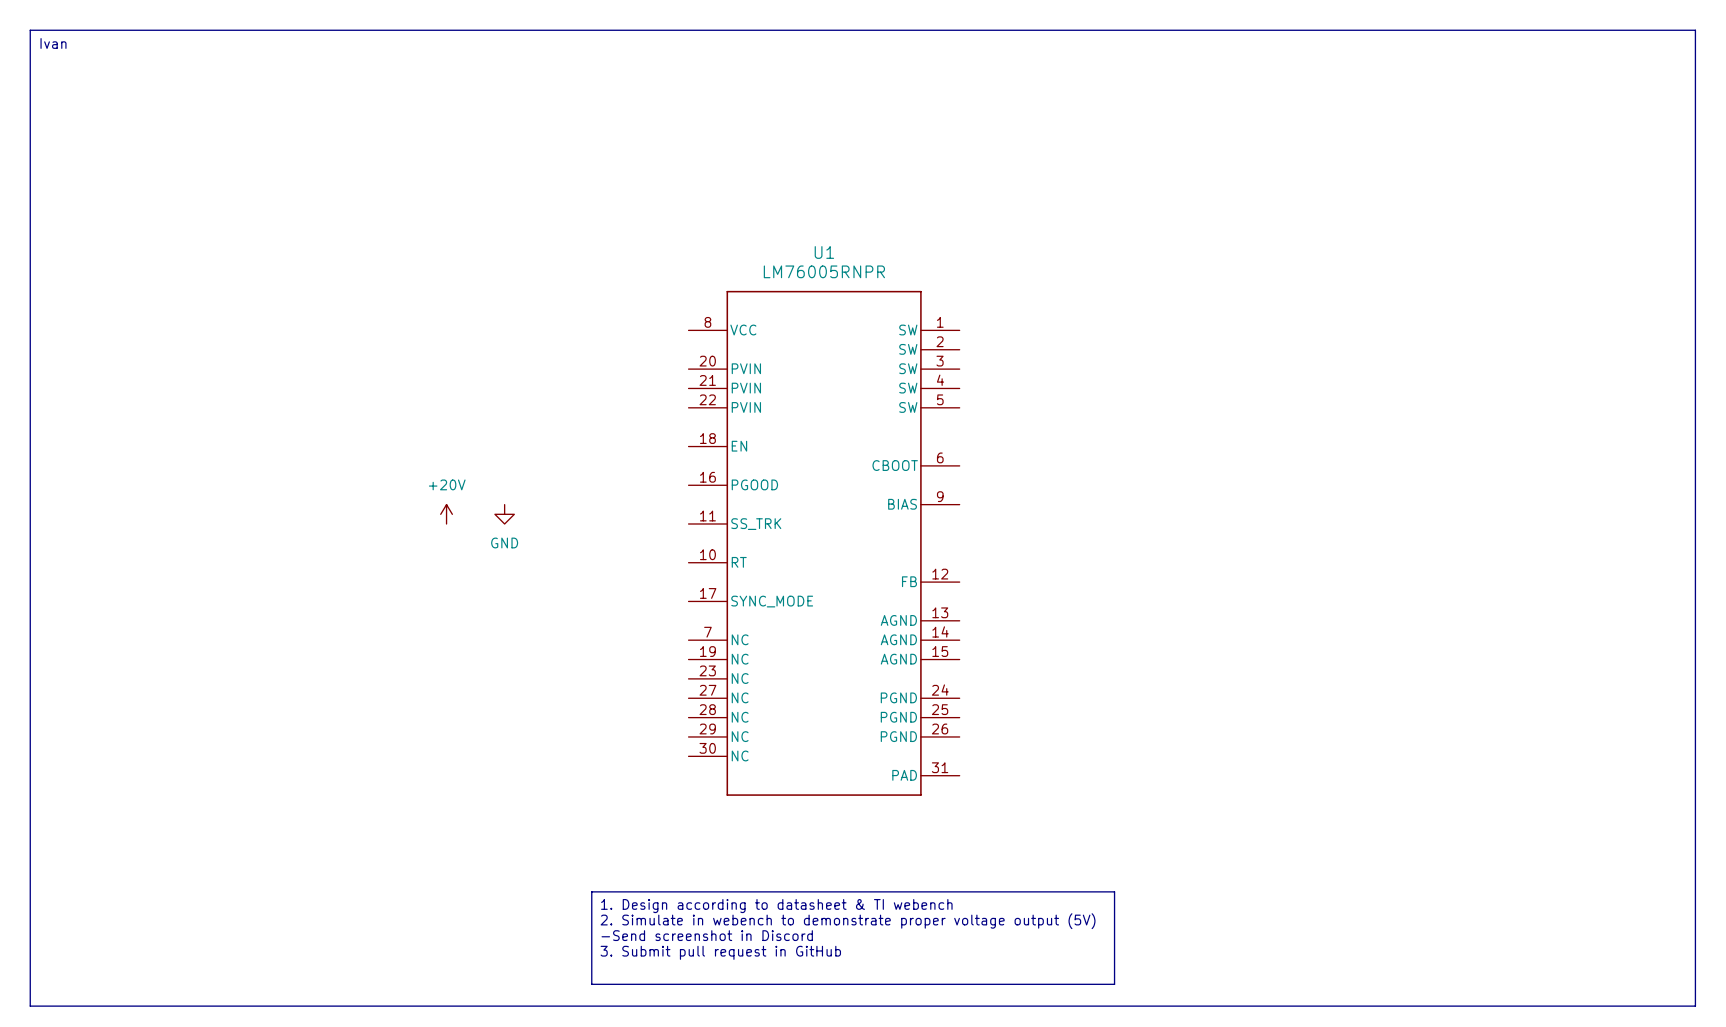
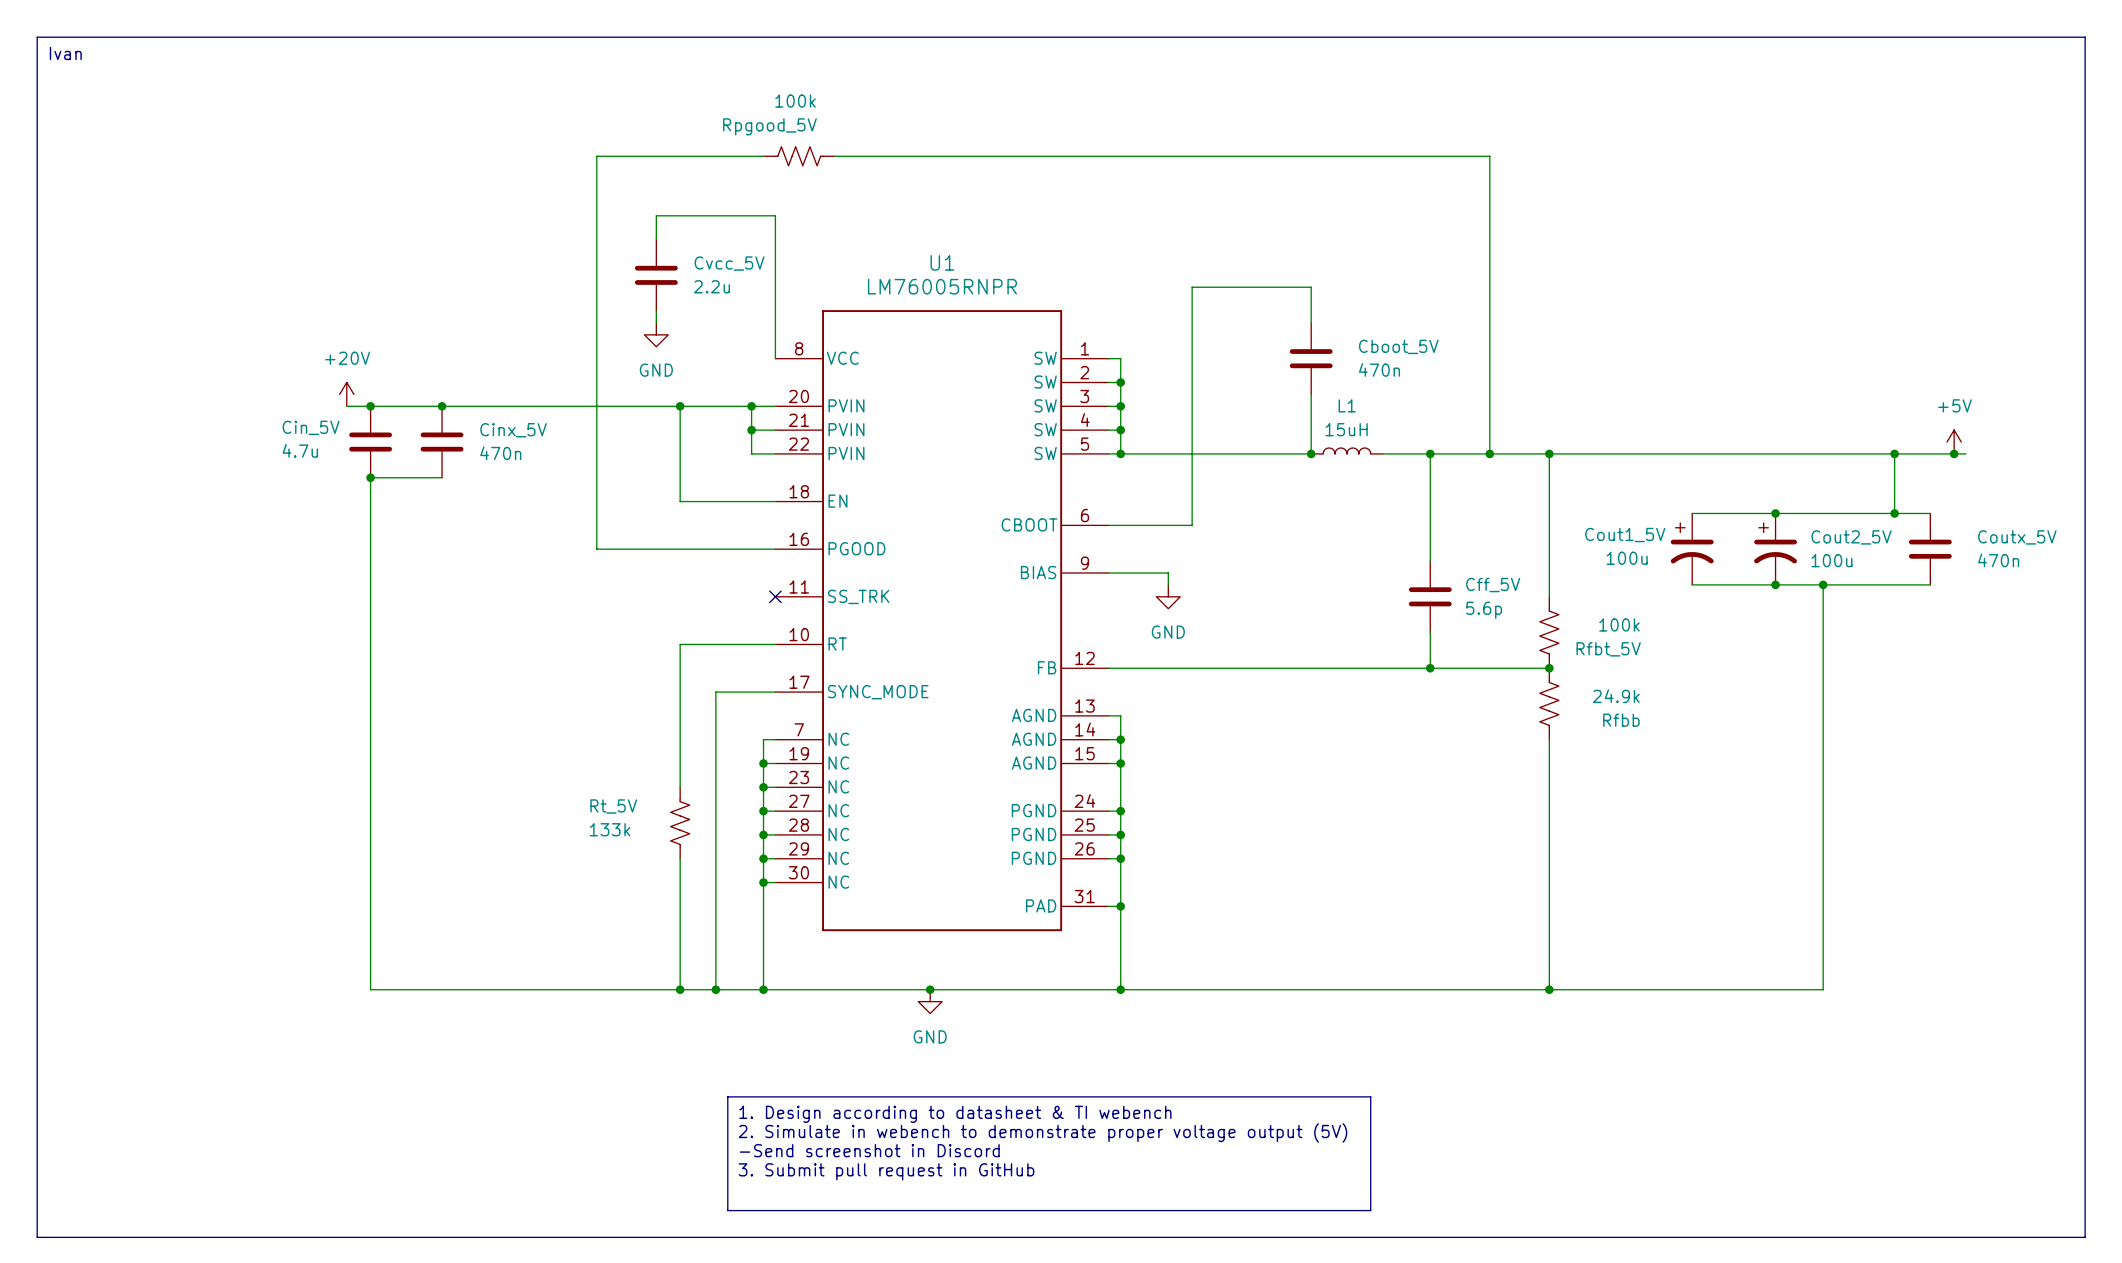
wire: none -> (763, 156) (596, 156) (596, 549) (775, 549)
Rpgood_5V: none -> 100k (799, 156)
wire: none -> (834, 156) (1489, 156) (1489, 453)
wire: none -> (656, 239) (656, 215) (775, 215) (775, 358)
Cvcc_5V: none -> 2.2u (656, 275)
wire: none -> (656, 311) (656, 322)
wire: none -> (1311, 322) (1311, 287) (1192, 287) (1192, 525) (1108, 525)
power symbol: none -> GND (656, 334)
wire: none -> (1108, 358) (1120, 358) (1120, 453)
Cboot_5V: none -> 470n (1311, 358)
wire: none -> (1108, 382) (1120, 382)
junction: none -> (1120, 382)
power symbol: none -> +20V (346, 394)
wire: none -> (1311, 394) (1311, 453) (1108, 453)
wire: none -> (346, 406) (775, 406)
junction: none -> (370, 406)
junction: none -> (442, 406)
wire: none -> (680, 406) (680, 501) (775, 501)
junction: none -> (680, 406)
wire: none -> (751, 406) (751, 453) (775, 453)
junction: none -> (751, 406)
wire: none -> (1108, 406) (1120, 406)
junction: none -> (1120, 406)
wire: none -> (751, 430) (775, 430)
junction: none -> (751, 430)
wire: none -> (1108, 430) (1120, 430)
junction: none -> (1120, 430)
Cin_5V: none -> 4.7u (370, 442)
Cinx_5V: none -> 470n (442, 442)
power symbol: none -> +5V (1954, 442)
L1: none -> 15uH (1346, 450)
junction: none -> (1120, 453)
junction: none -> (1311, 453)
wire: none -> (1382, 453) (1966, 453)
wire: none -> (1430, 453) (1430, 561)
junction: none -> (1430, 453)
junction: none -> (1489, 453)
wire: none -> (1549, 453) (1549, 596)
junction: none -> (1549, 453)
wire: none -> (1894, 453) (1894, 513)
junction: none -> (1894, 453)
junction: none -> (1954, 453)
junction: none -> (370, 477)
wire: none -> (442, 477) (370, 477) (370, 989) (1823, 989) (1823, 584)
wire: none -> (1692, 513) (1930, 513)
junction: none -> (1775, 513)
junction: none -> (1894, 513)
Cout1_5V: none -> 100u (1692, 549)
Cout2_5V: none -> 100u (1775, 549)
Coutx_5V: none -> 470n (1930, 549)
wire: none -> (1108, 573) (1168, 573) (1168, 584)
wire: none -> (1692, 584) (1930, 584)
junction: none -> (1775, 584)
junction: none -> (1823, 584)
no-connect mark: none -> (775, 596)
power symbol: none -> GND (1168, 596)
Cff_5V: none -> 5.6p (1430, 596)
power symbol: +20V (446, 514) -> none
power symbol: GND (504, 514) -> none
wire: none -> (1430, 632) (1430, 668)
Rfbt_5V: none -> 100k (1549, 632)
wire: none -> (775, 644) (680, 644) (680, 787)
U1 position: (824, 543) -> (942, 620)
wire: none -> (1108, 668) (1549, 668)
junction: none -> (1430, 668)
junction: none -> (1549, 668)
wire: none -> (775, 692) (715, 692) (715, 989)
Rfbb: none -> 24.9k (1549, 703)
wire: none -> (1108, 715) (1120, 715) (1120, 989)
wire: none -> (775, 739) (763, 739) (763, 989)
wire: none -> (1108, 739) (1120, 739)
junction: none -> (1120, 739)
wire: none -> (1549, 739) (1549, 989)
wire: none -> (763, 763) (775, 763)
junction: none -> (763, 763)
wire: none -> (1108, 763) (1120, 763)
junction: none -> (1120, 763)
wire: none -> (763, 787) (775, 787)
junction: none -> (763, 787)
wire: none -> (763, 811) (775, 811)
junction: none -> (763, 811)
wire: none -> (1108, 811) (1120, 811)
junction: none -> (1120, 811)
Rt_5V: none -> 133k (680, 823)
wire: none -> (763, 834) (775, 834)
junction: none -> (763, 834)
wire: none -> (1108, 834) (1120, 834)
junction: none -> (1120, 834)
wire: none -> (680, 858) (680, 989)
wire: none -> (763, 858) (775, 858)
junction: none -> (763, 858)
wire: none -> (1108, 858) (1120, 858)
junction: none -> (1120, 858)
wire: none -> (763, 882) (775, 882)
junction: none -> (763, 882)
wire: none -> (1108, 906) (1120, 906)
junction: none -> (1120, 906)
junction: none -> (680, 989)
junction: none -> (715, 989)
junction: none -> (763, 989)
junction: none -> (930, 989)
junction: none -> (1120, 989)
junction: none -> (1549, 989)
power symbol: none -> GND (930, 1001)

